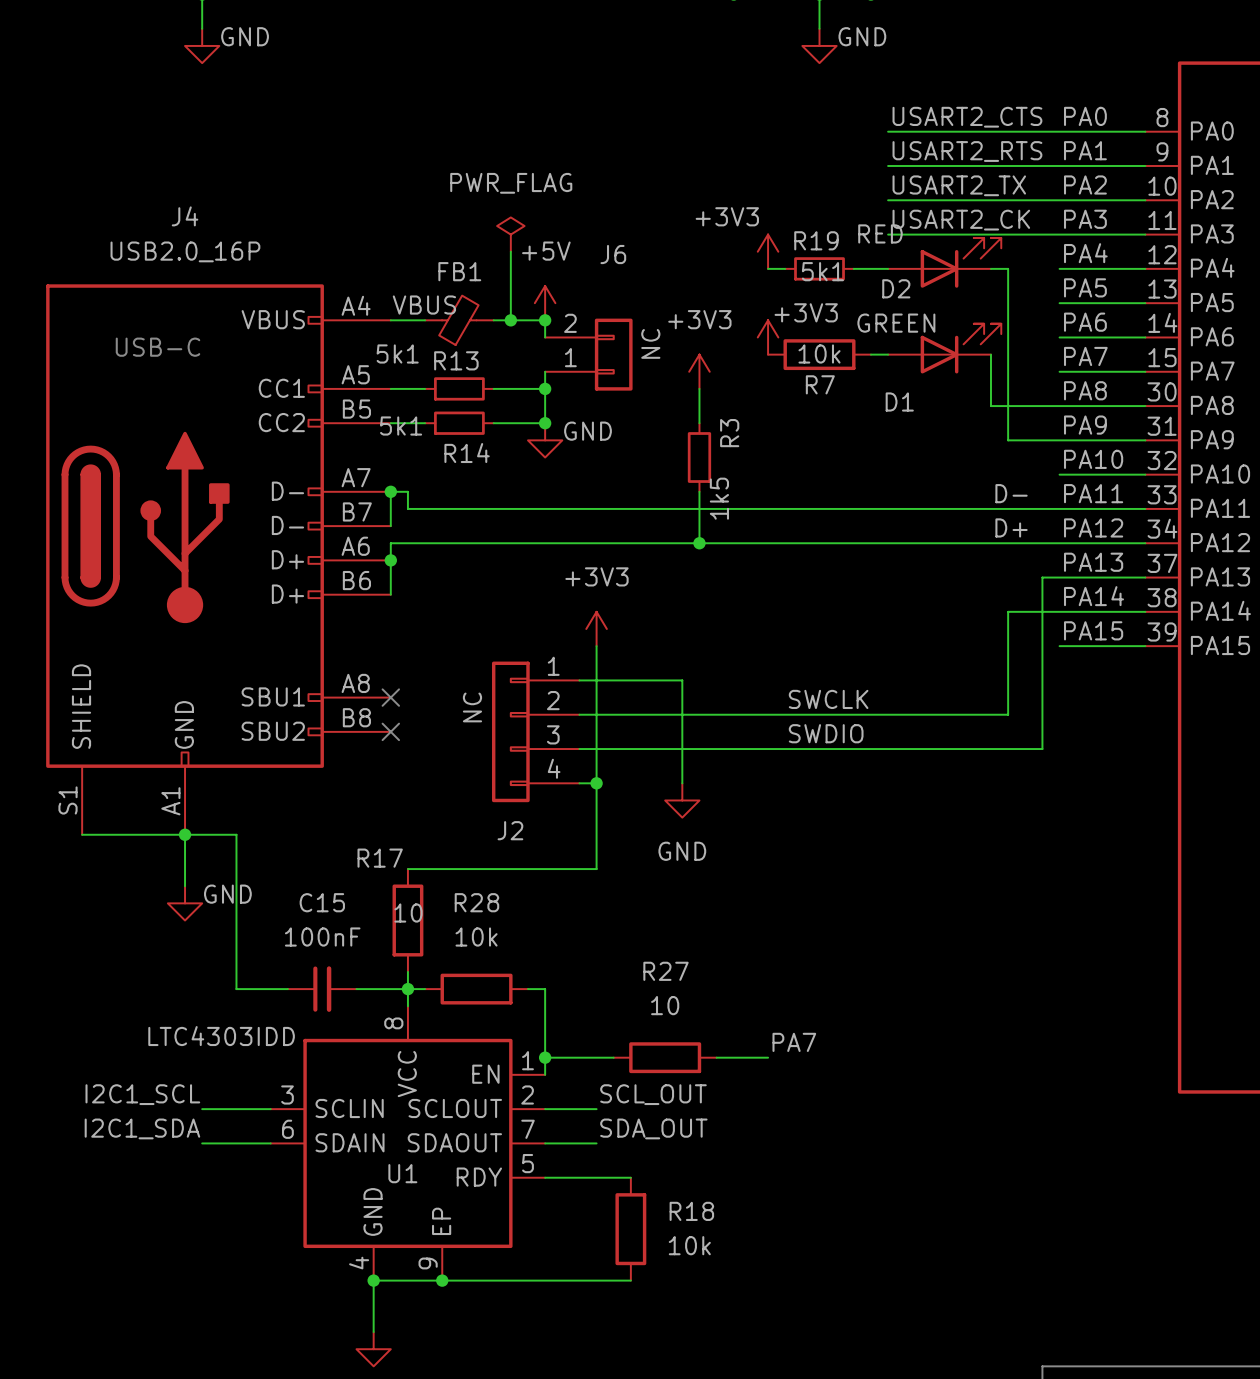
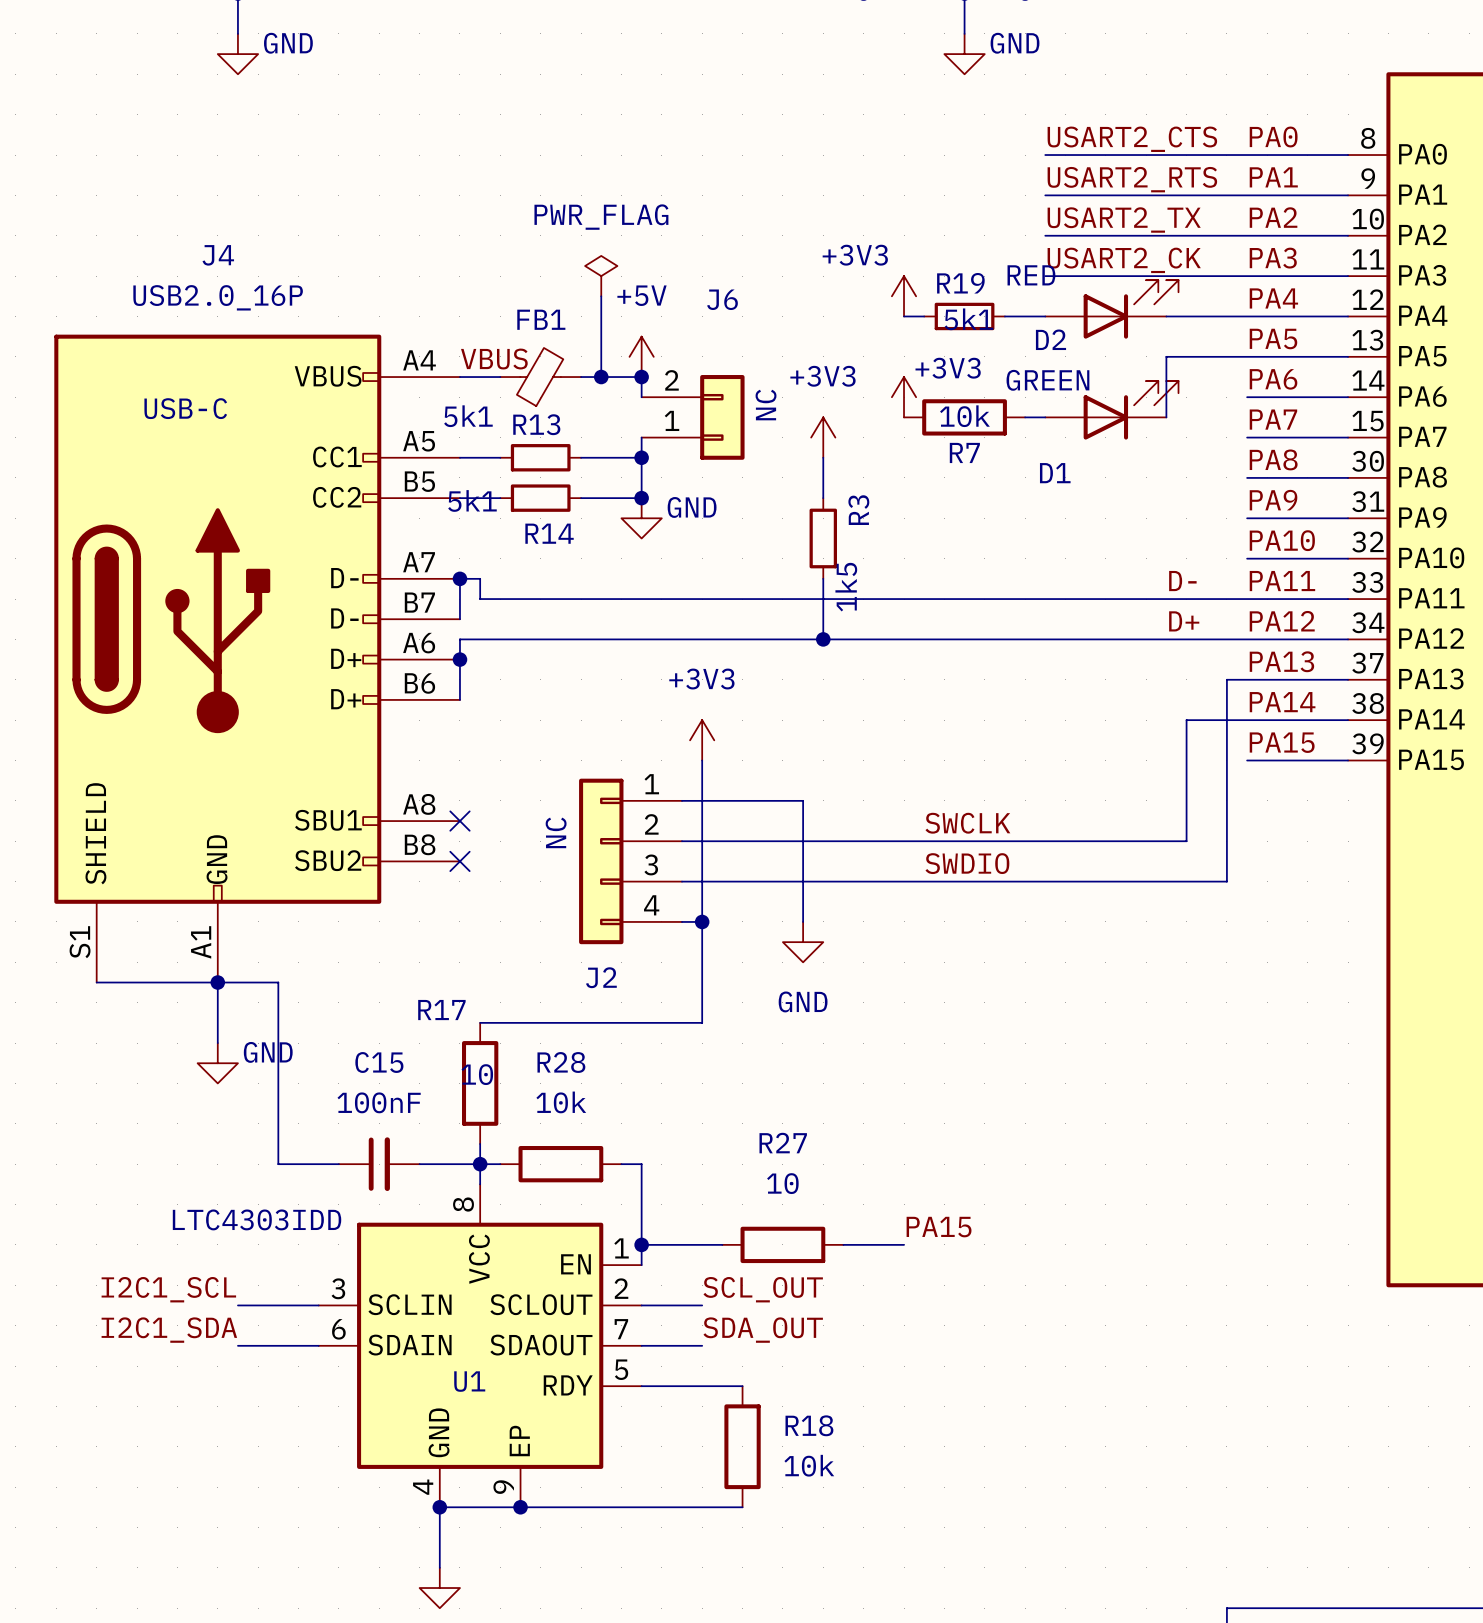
wire: (1008, 268) (1008, 440) (1059, 440) -> (1186, 316) (1247, 316)
wire: (990, 354) (990, 406) (1059, 406) -> (1166, 417) (1166, 356) (1247, 356)
label: PA7 (794, 1042) -> PA15 (939, 1227)

